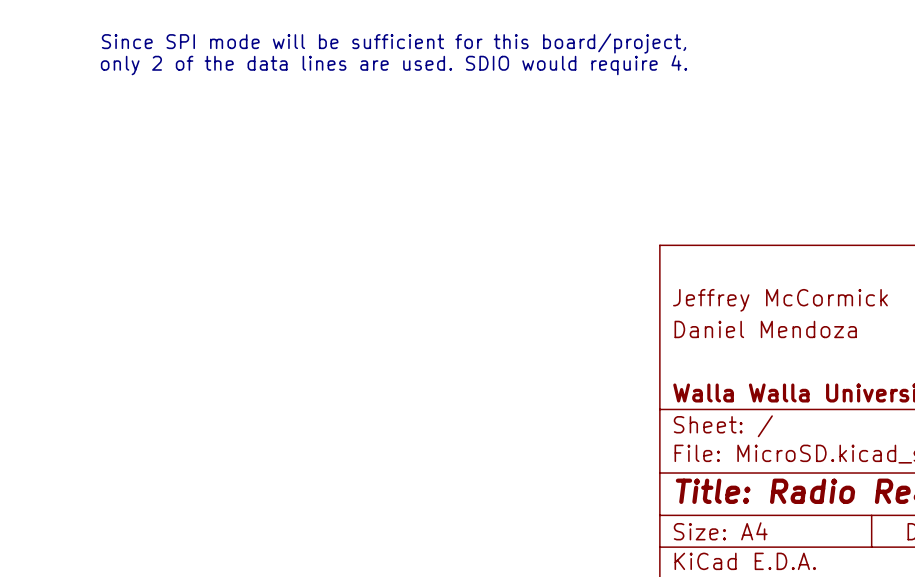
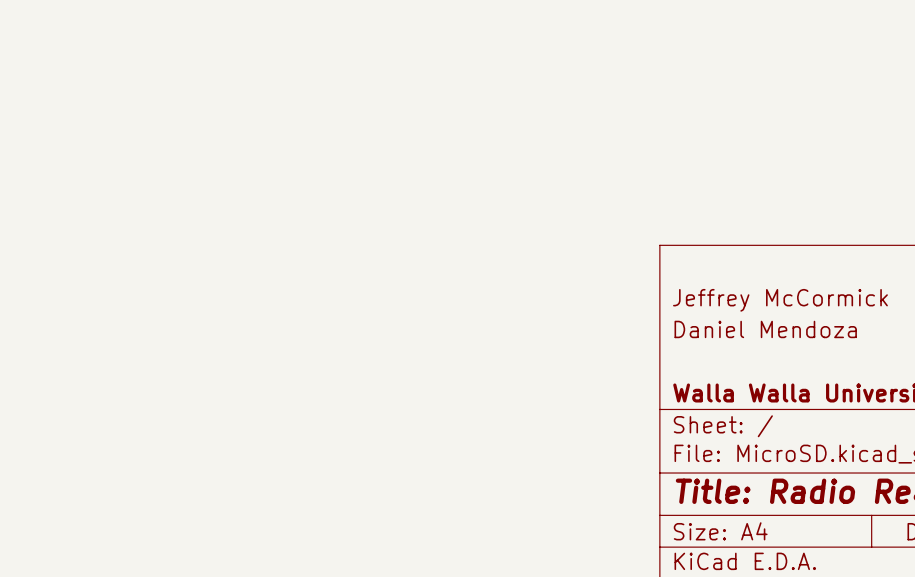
text: Since SPI mode will be sufficient for this board/project, (394, 43) -> none
text: only 2 of the data lines are used. SDIO would require 4. (394, 65) -> none

